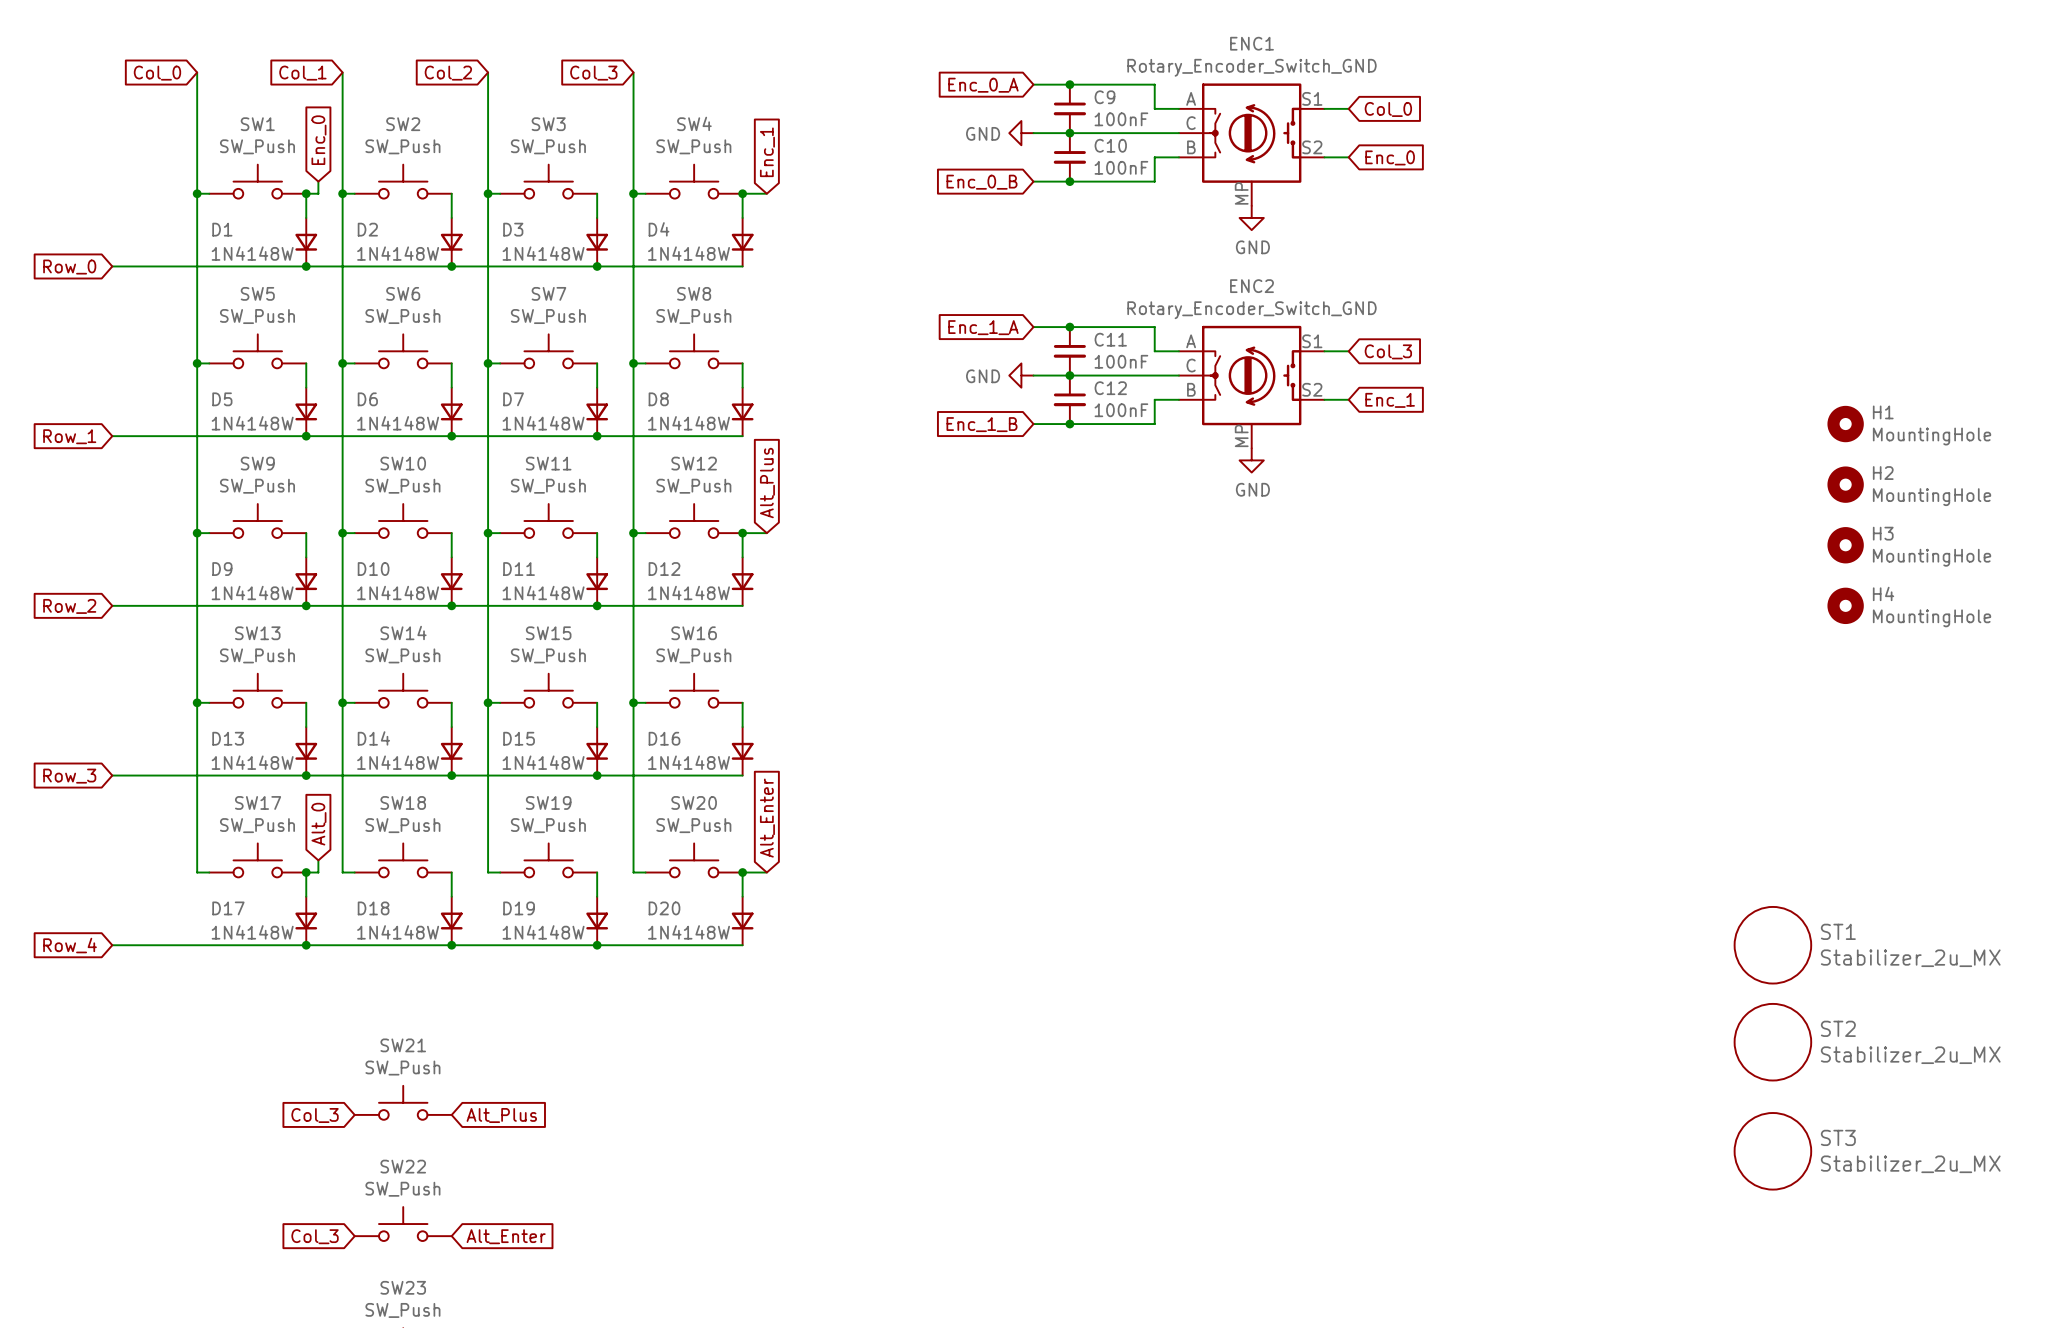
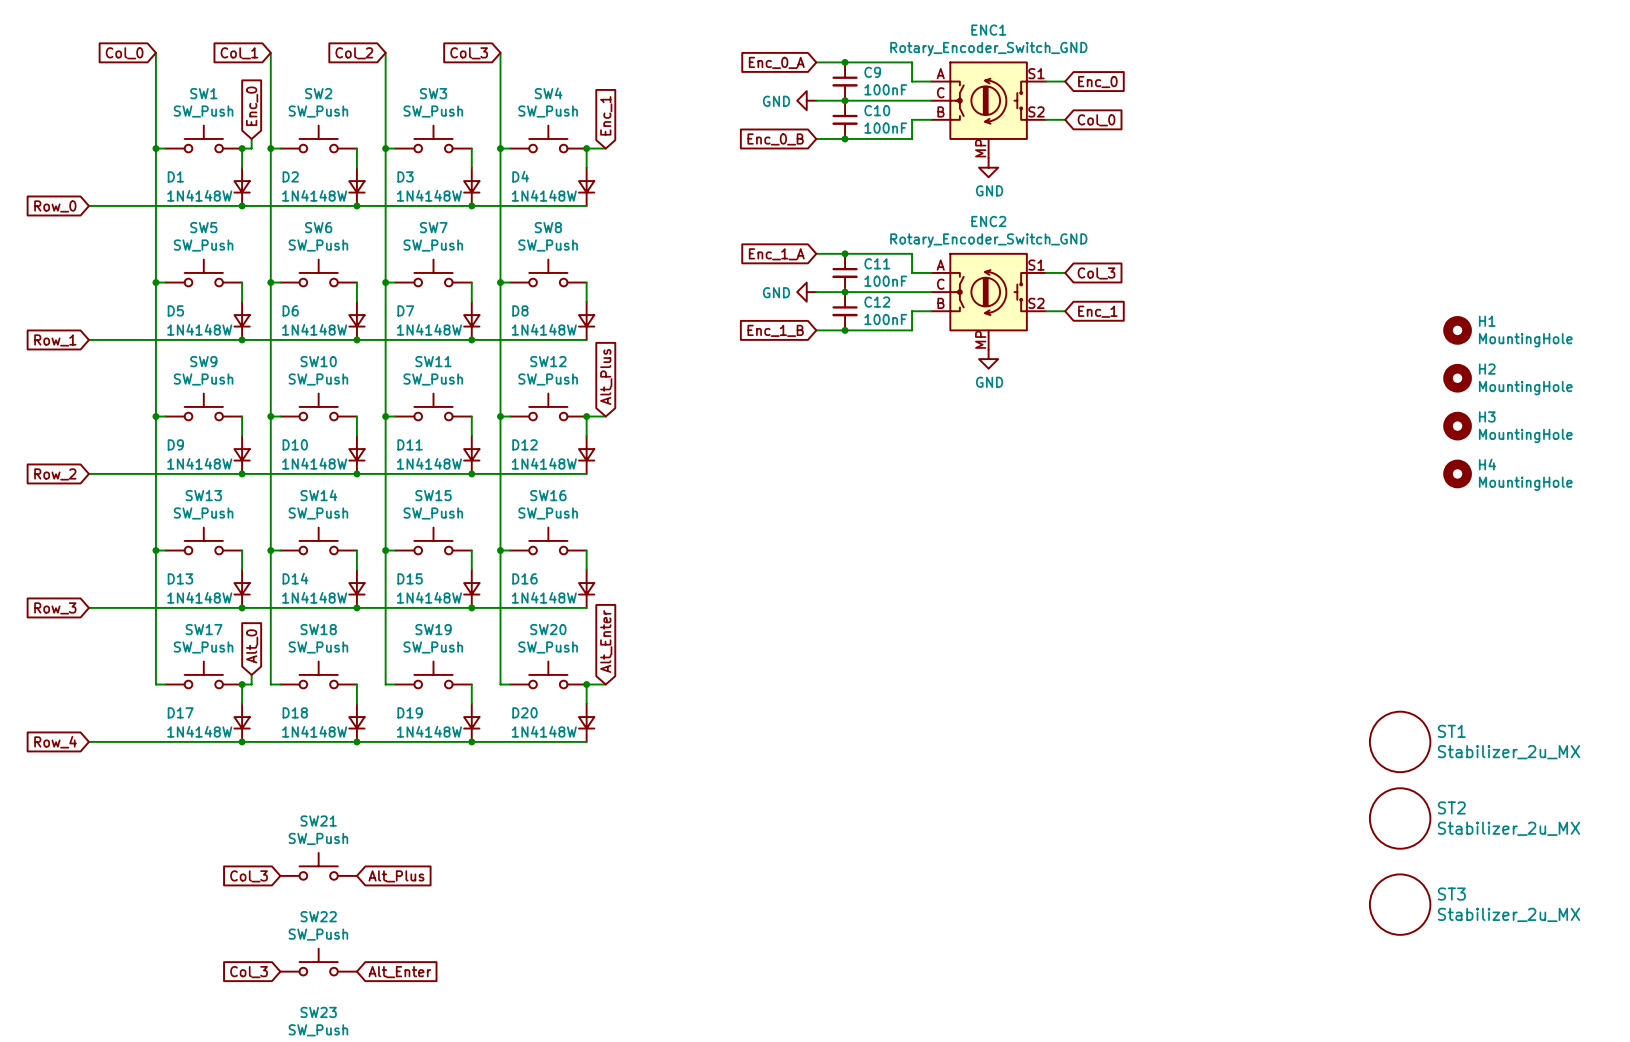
global label: Col_0 (1388, 109) -> Enc_0 (1097, 82)
global label: Enc_0 (1390, 157) -> Col_0 (1096, 120)

